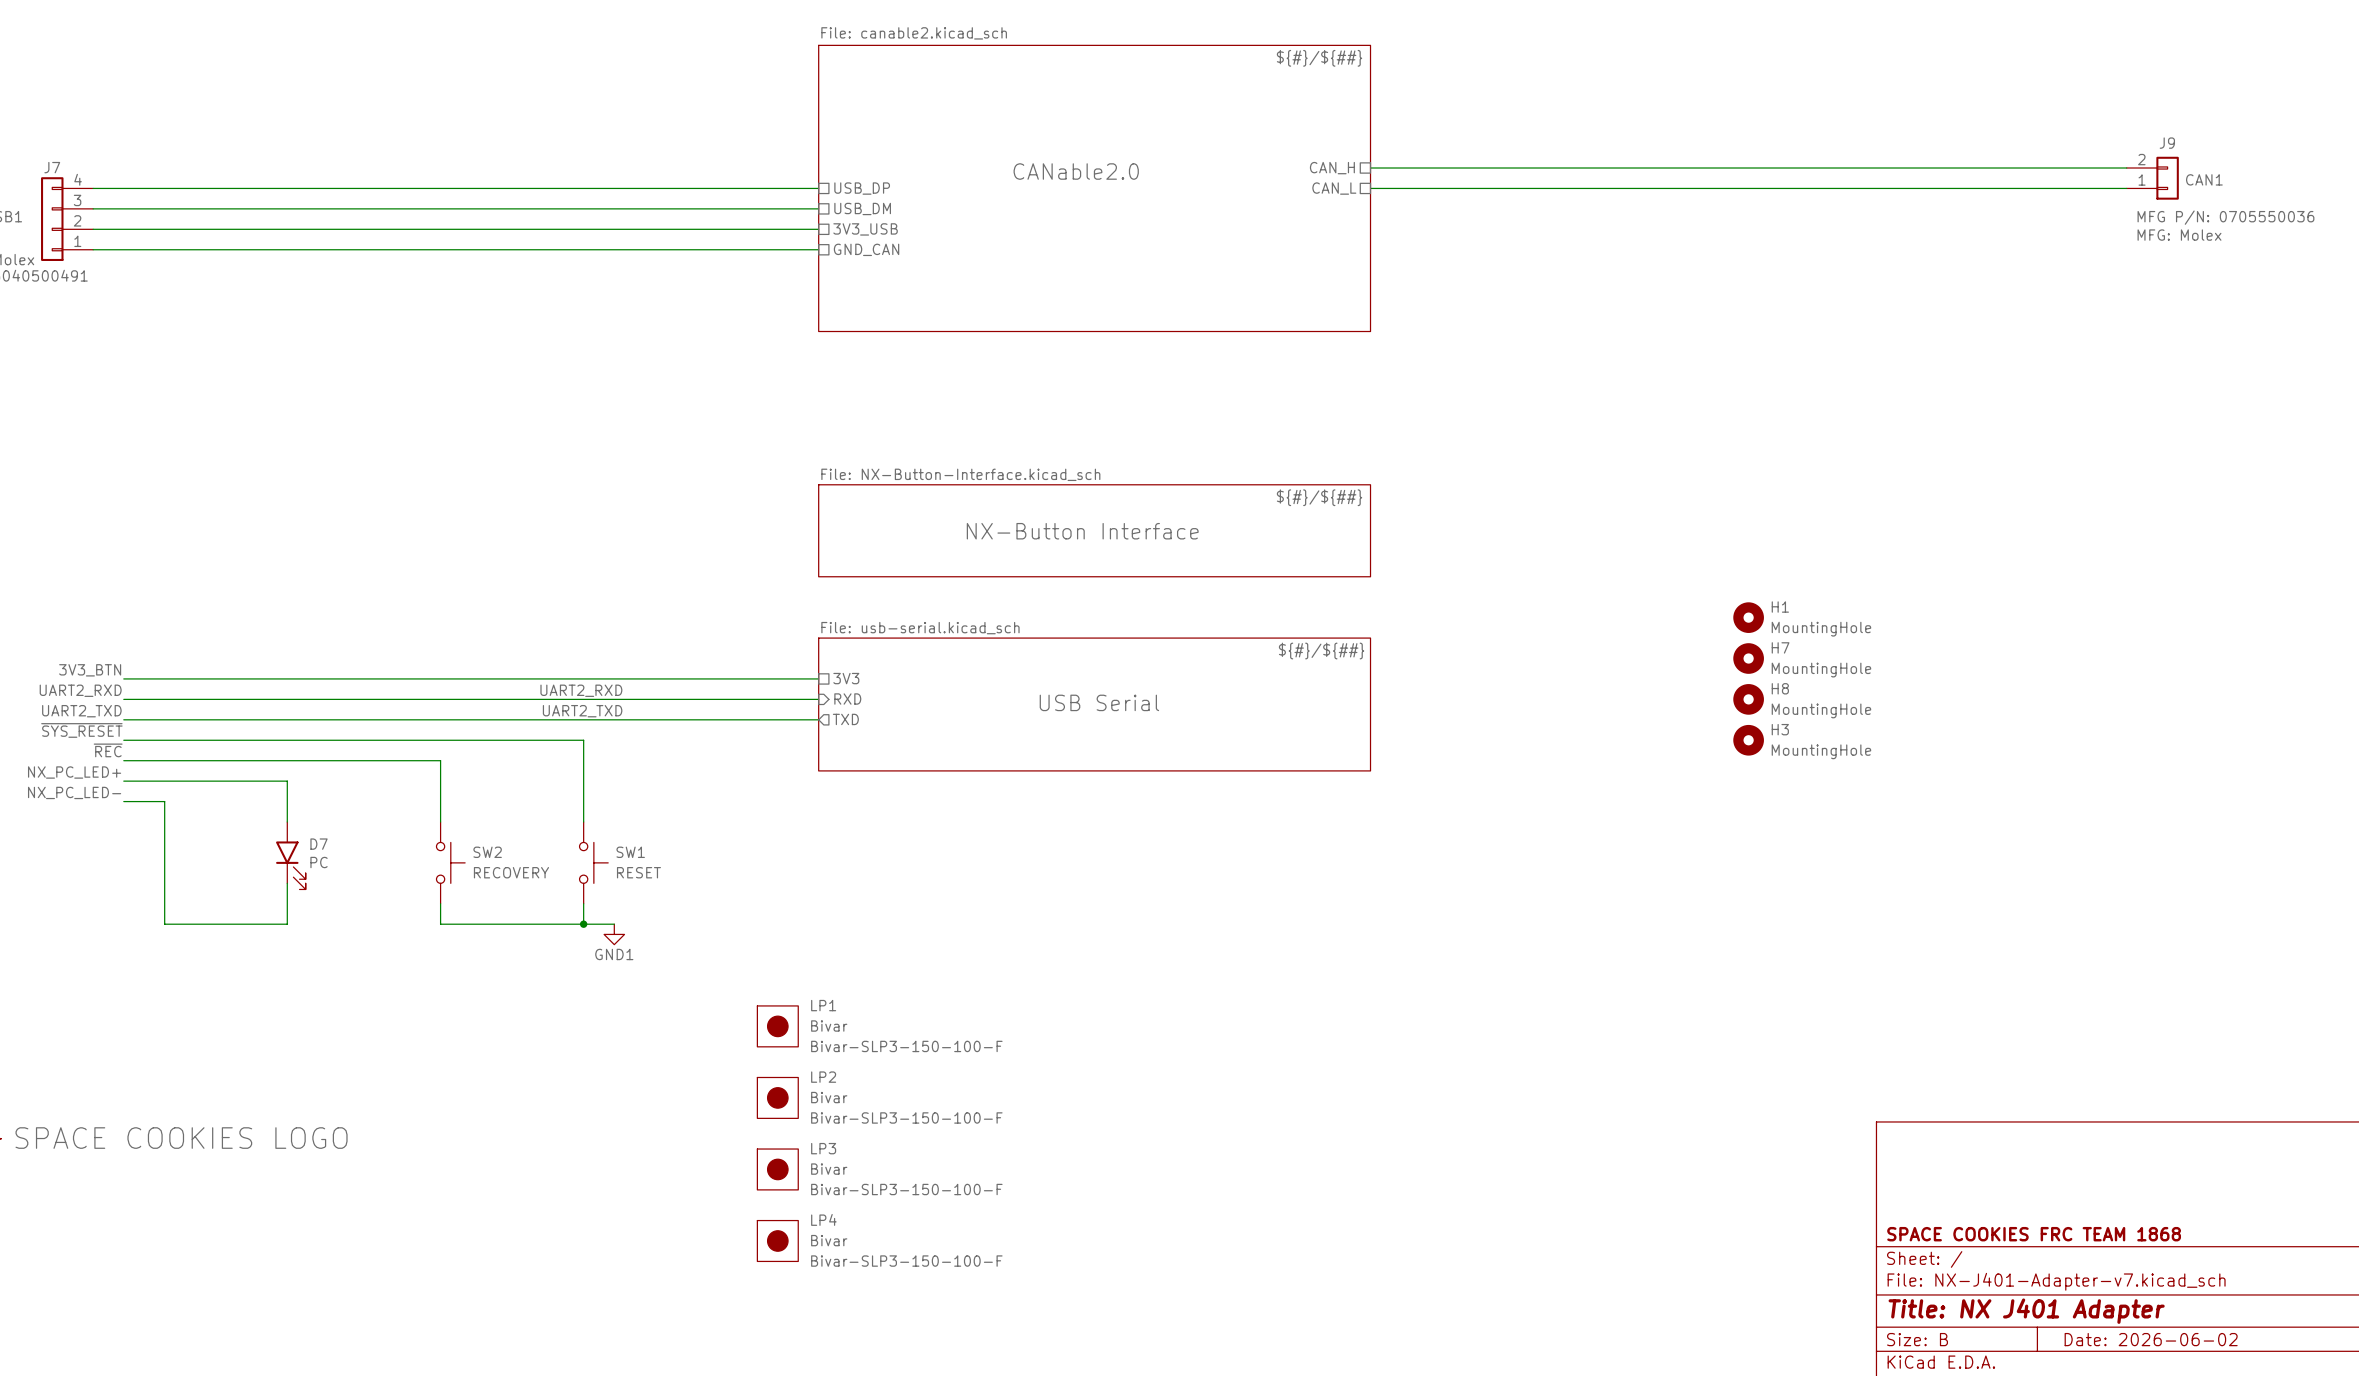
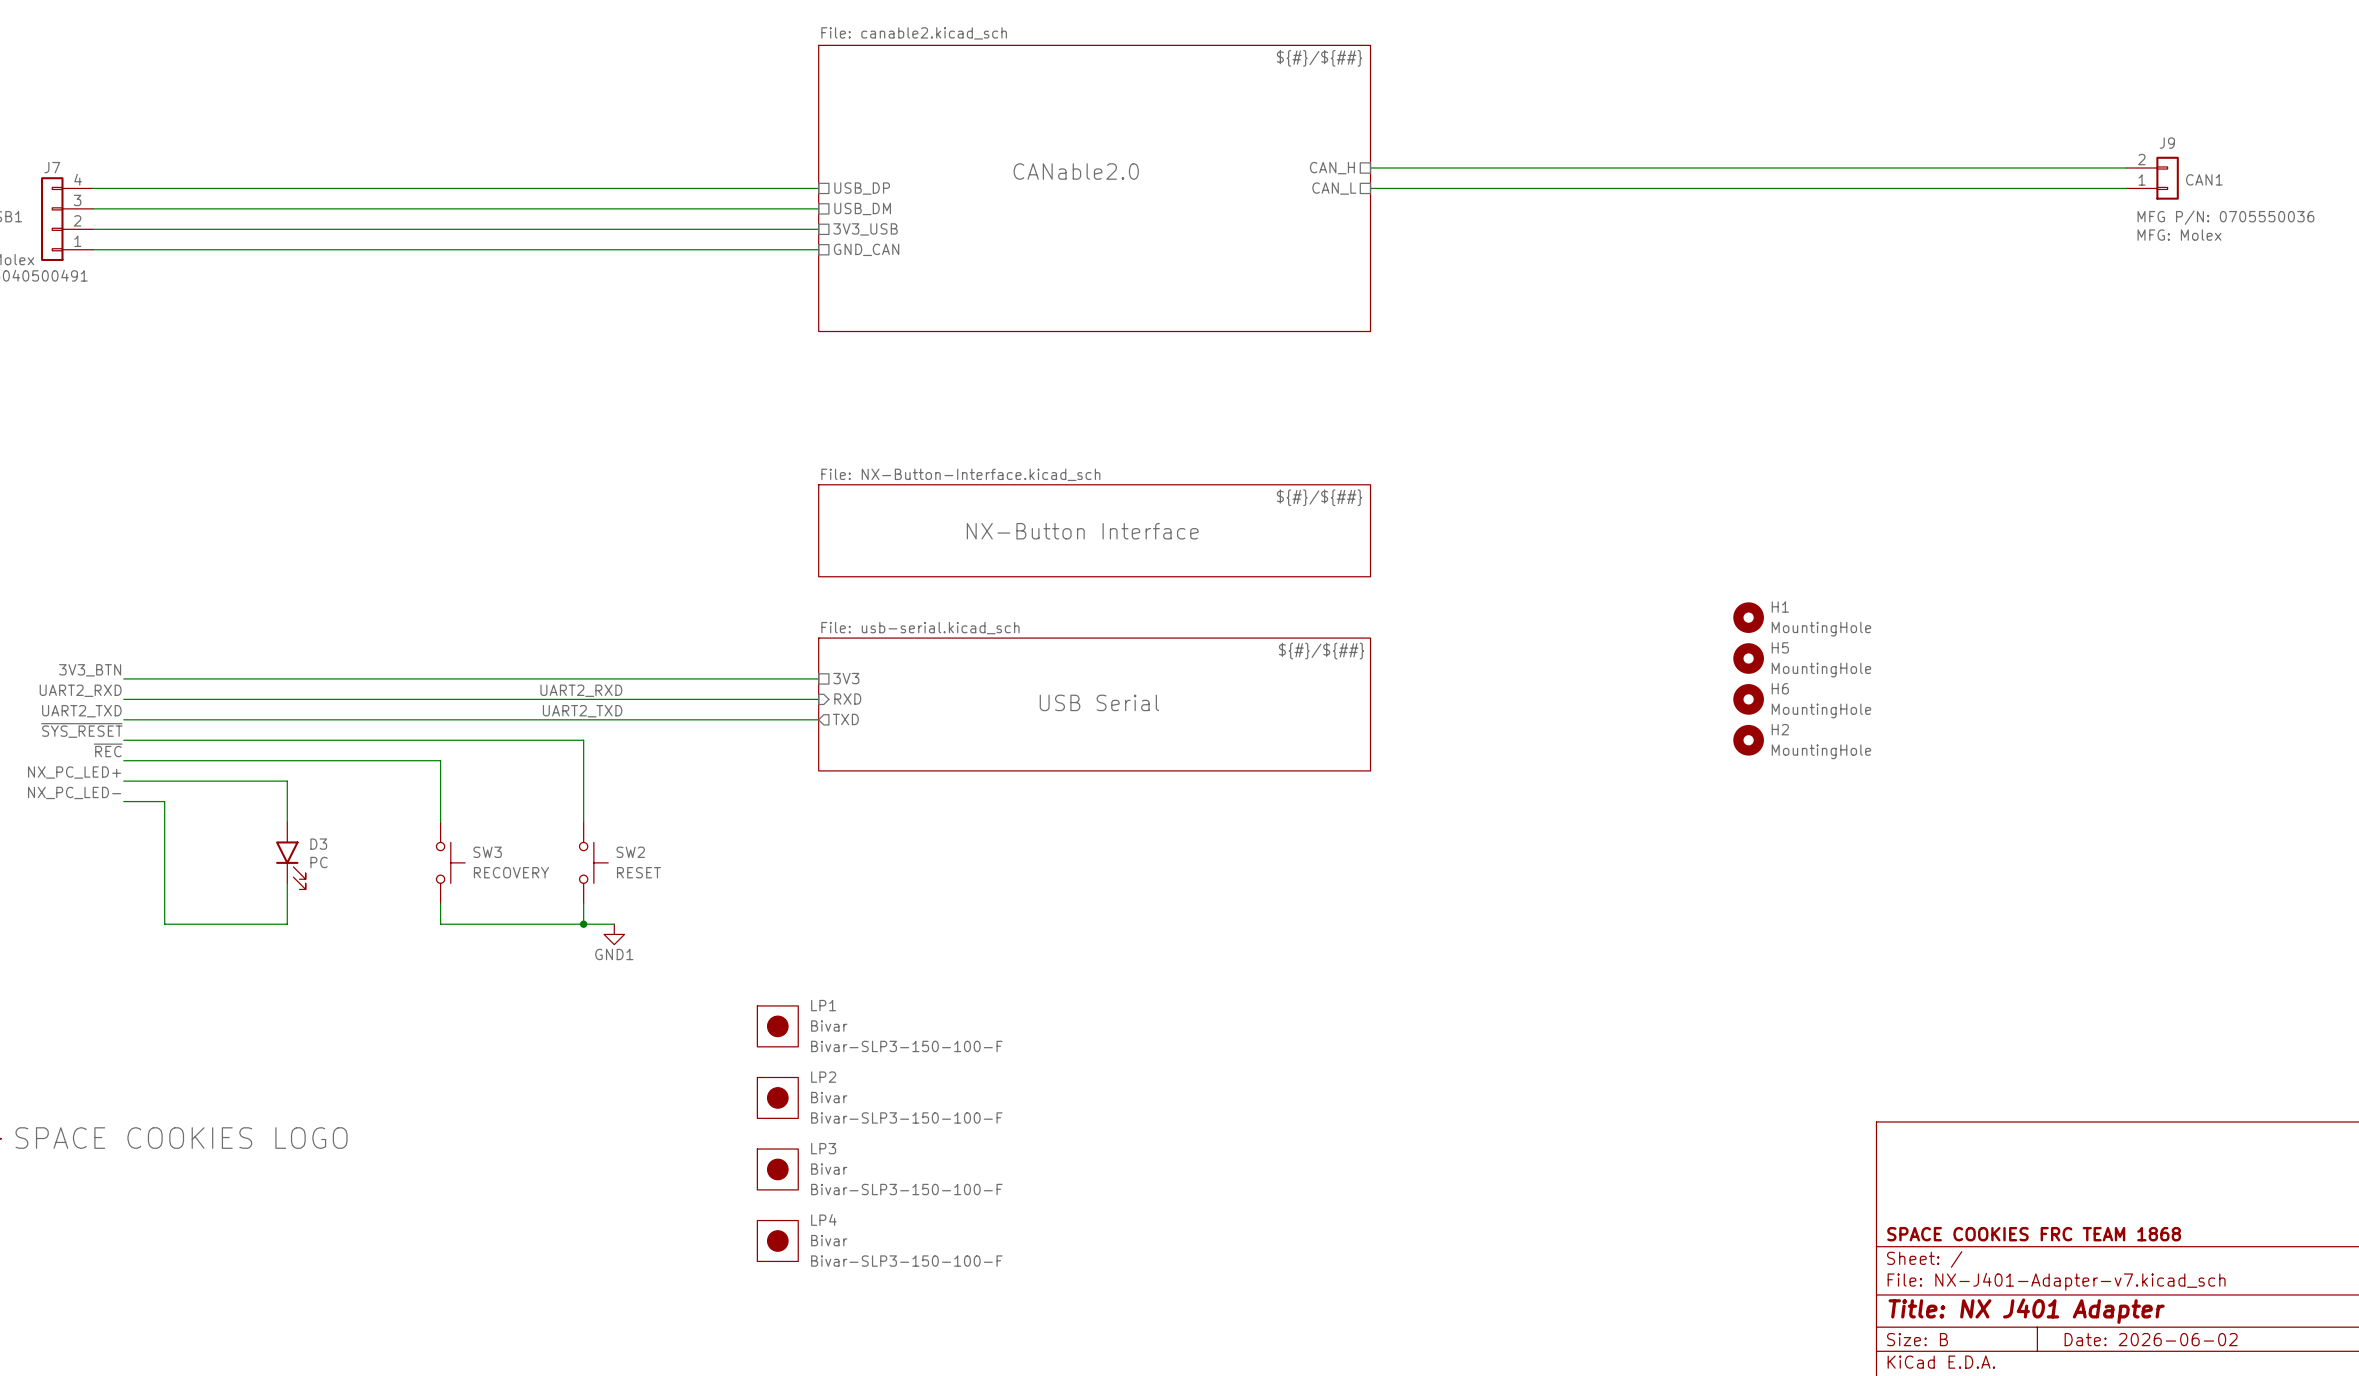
H7 name: H7 (1780, 647) -> H5 (1780, 647)
H8 name: H8 (1780, 688) -> H6 (1780, 688)
H3 name: H3 (1780, 729) -> H2 (1780, 729)
D7 name: D7 (319, 844) -> D3 (318, 844)
SW2 name: SW2 (487, 852) -> SW3 (487, 852)
SW1 name: SW1 (630, 852) -> SW2 (630, 852)

